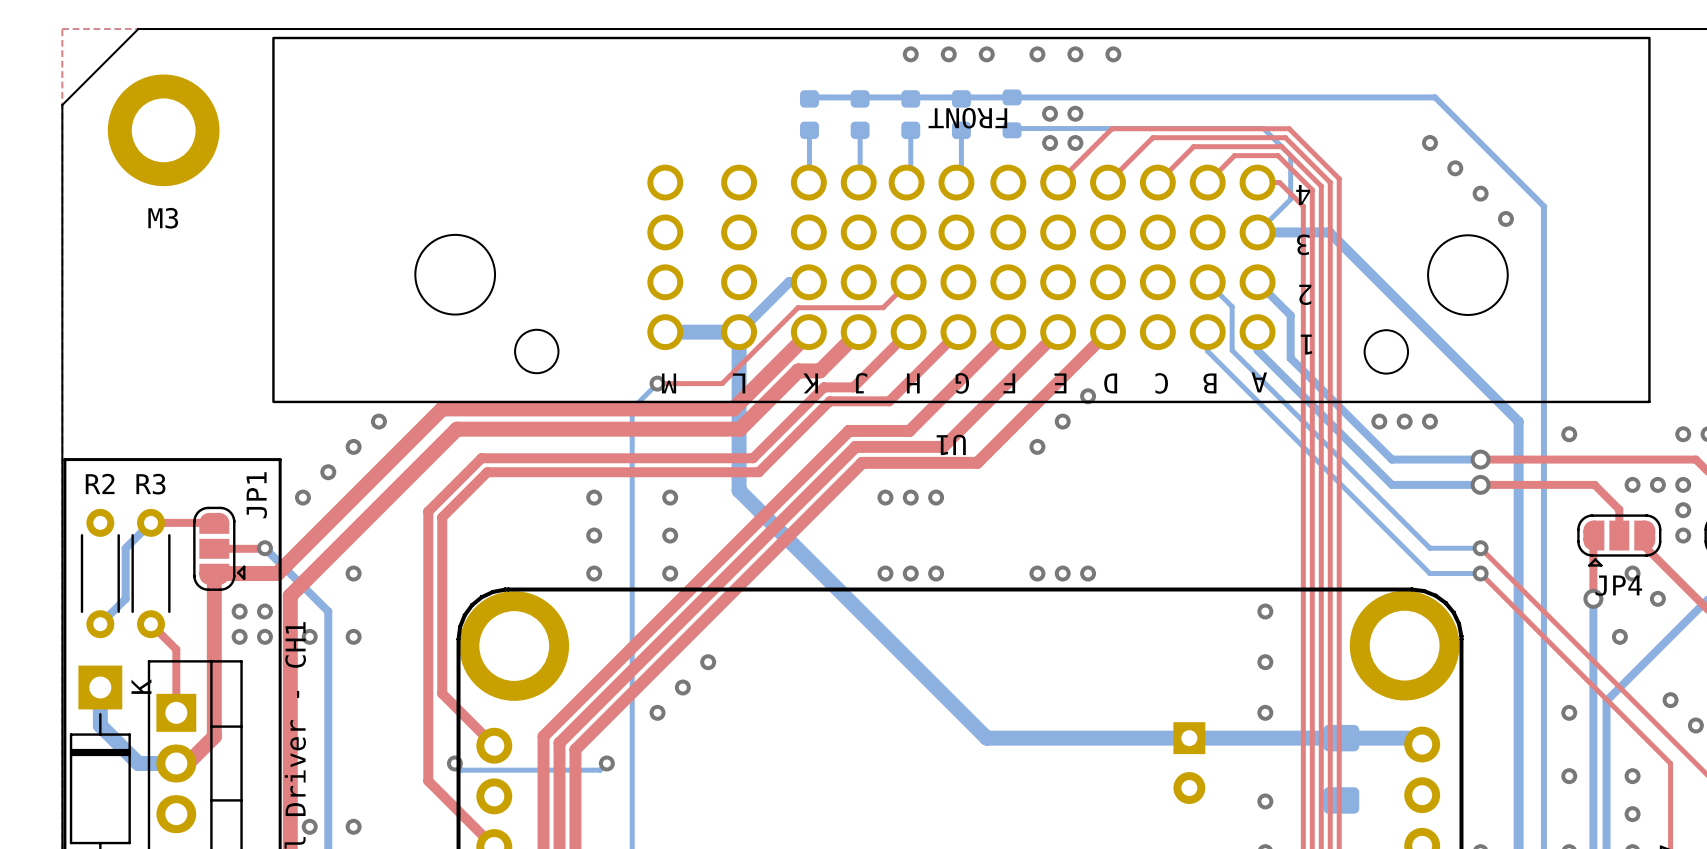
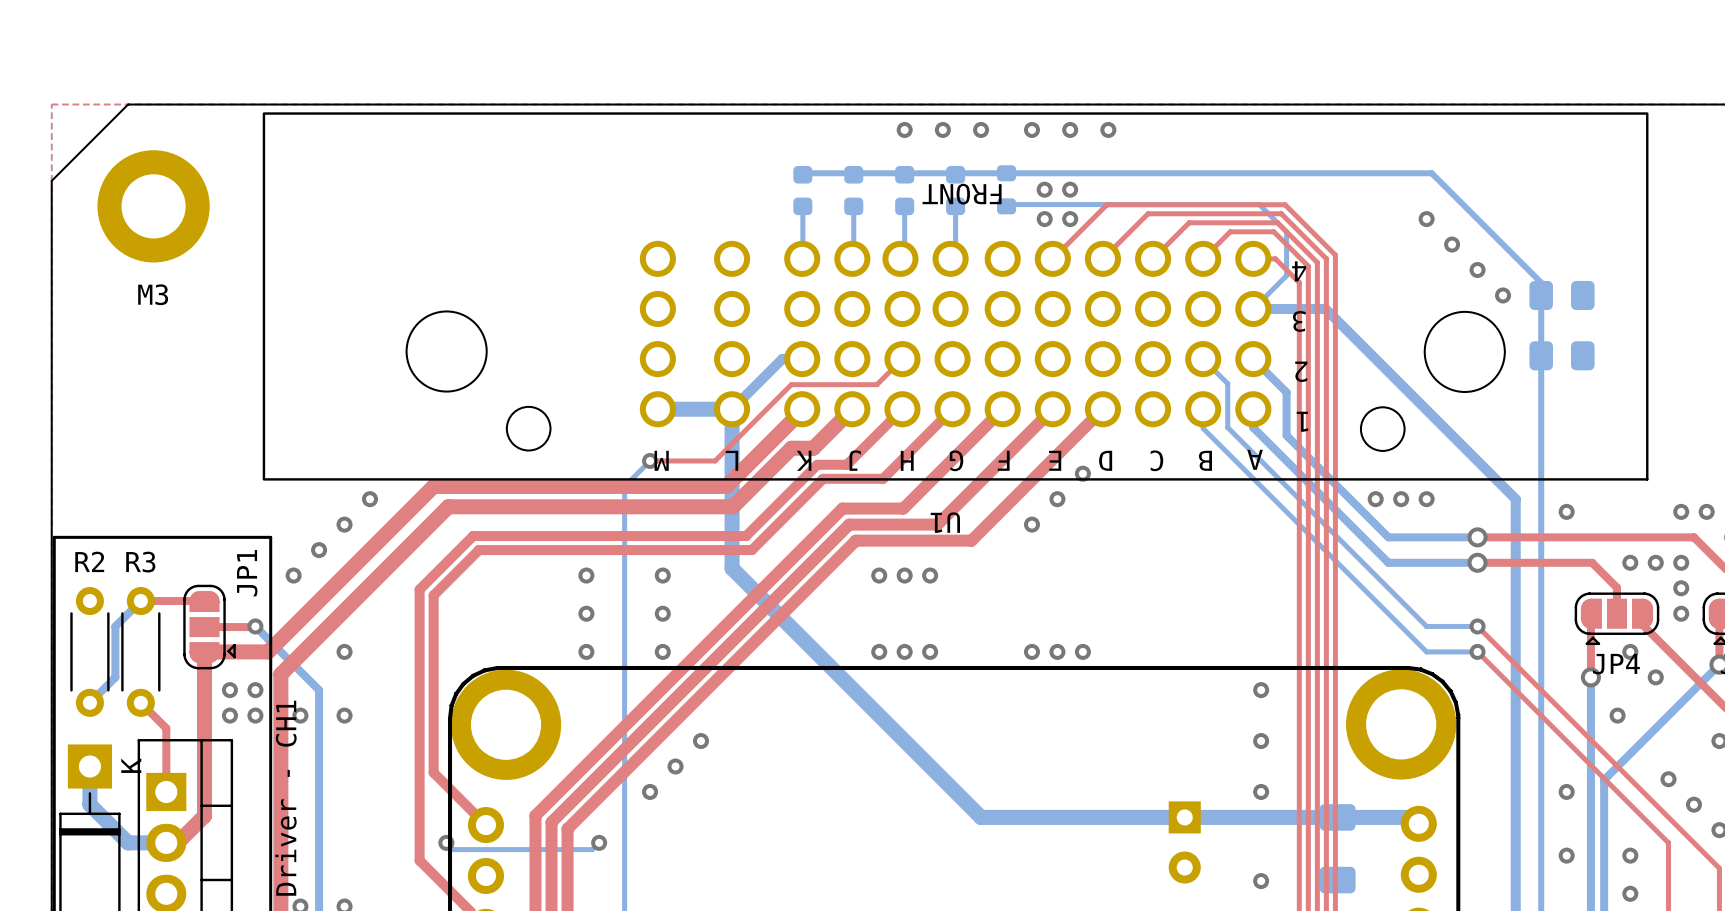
part: none -> (1562, 295)
part: none -> (1562, 355)

